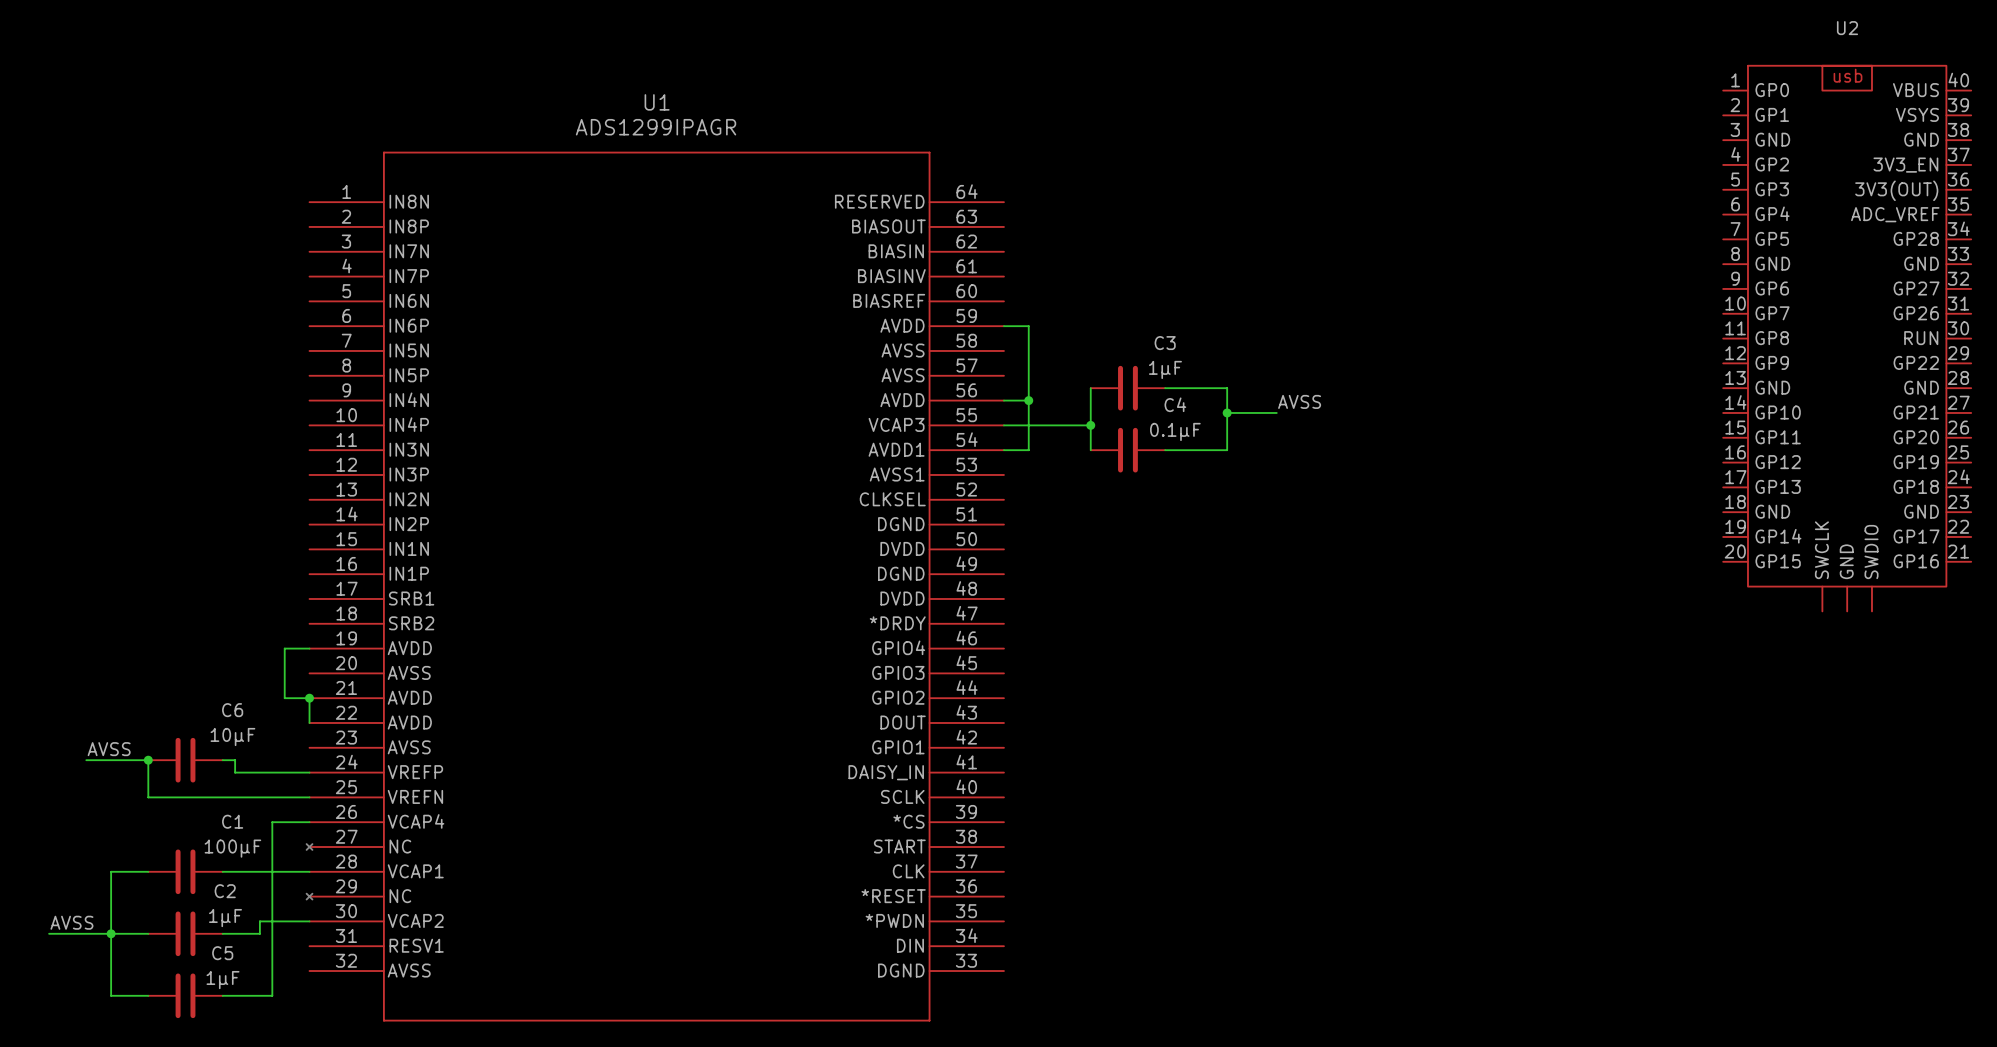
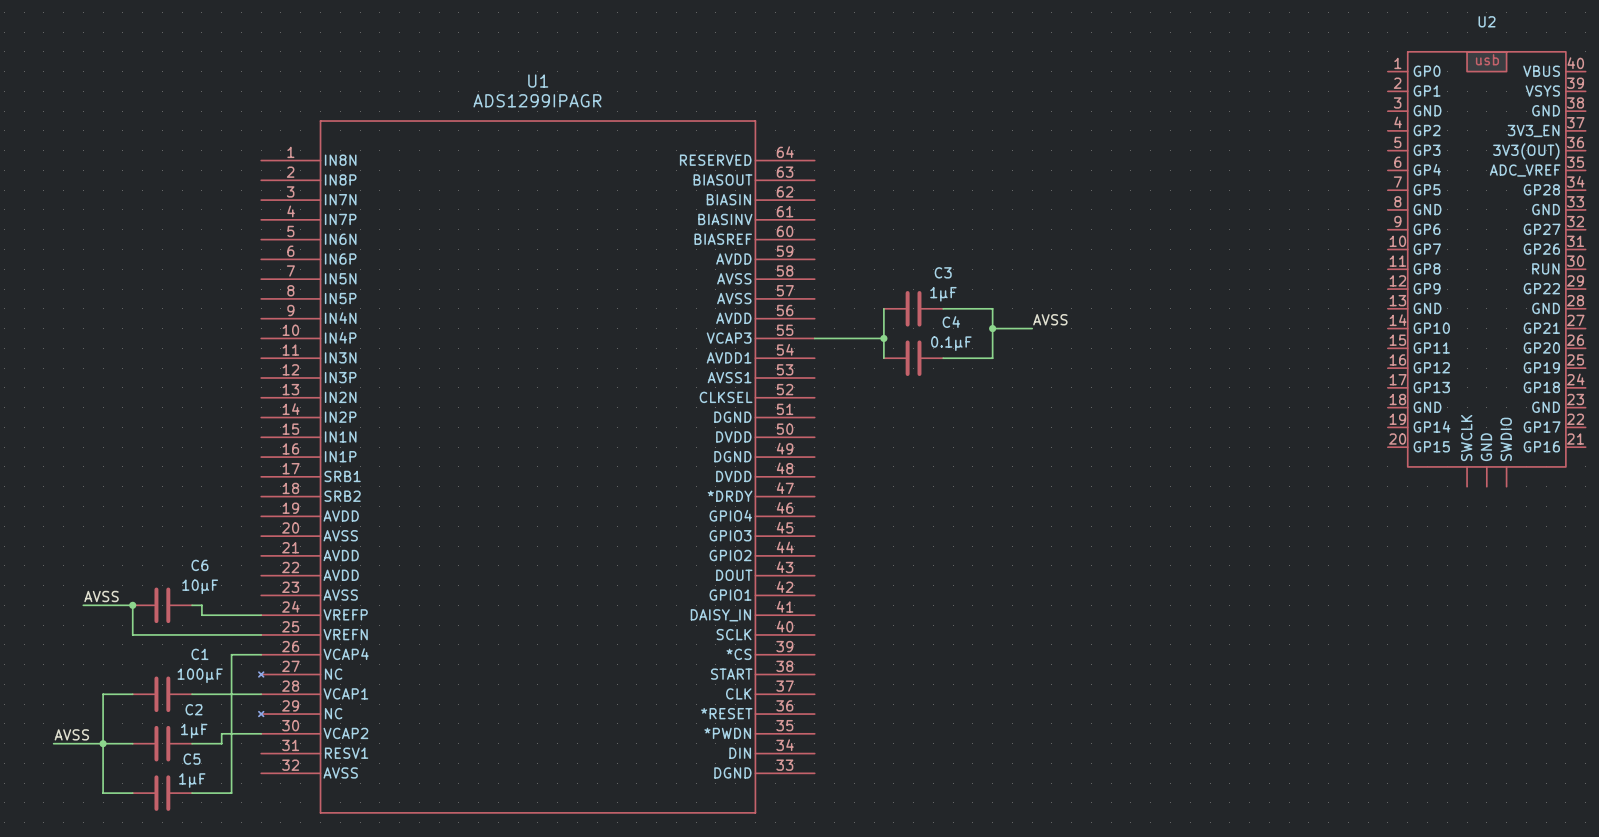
wire: (1003, 326) (1028, 326) (1028, 450) (1003, 450) -> none
wire: (1003, 400) (1028, 400) -> none
junction: (1028, 400) -> none
wire: (309, 648) (284, 648) (284, 698) (309, 698) (309, 722) -> none
junction: (309, 698) -> none

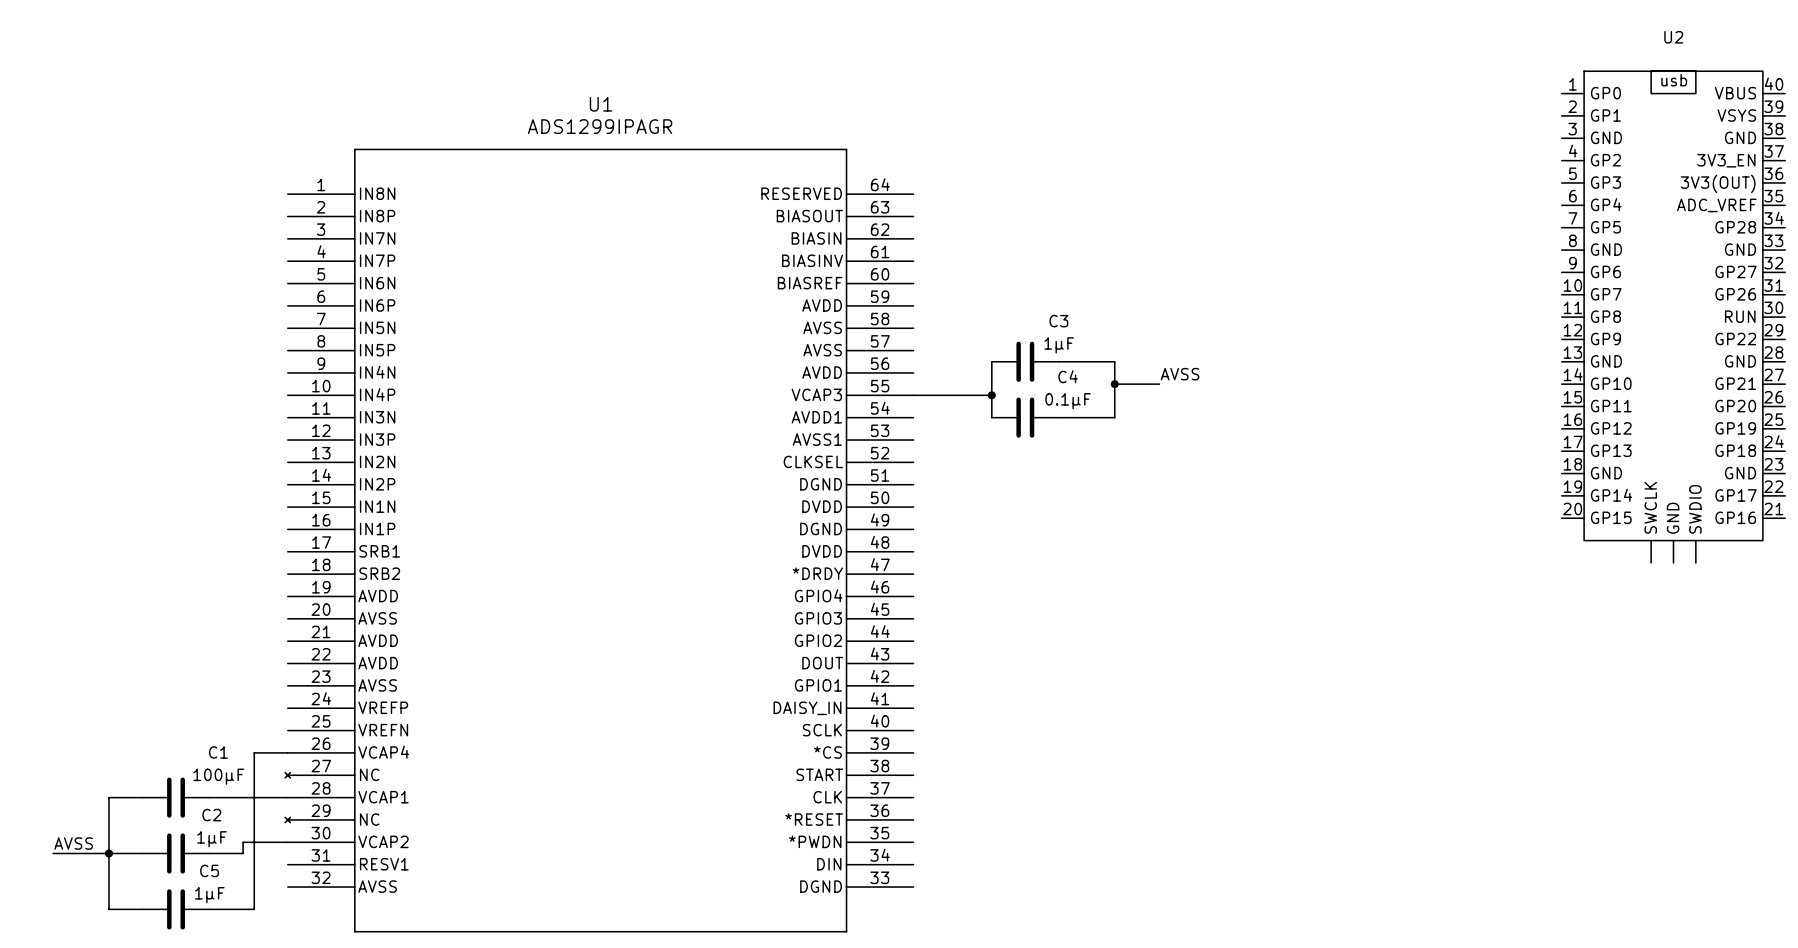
label: AVSS (101, 596) -> none
wire: (83, 605) (132, 605) (132, 634) (261, 634) -> none
junction: (132, 605) -> none
C6: 10µF (162, 605) -> none
wire: (192, 605) (201, 605) (201, 615) (261, 615) -> none

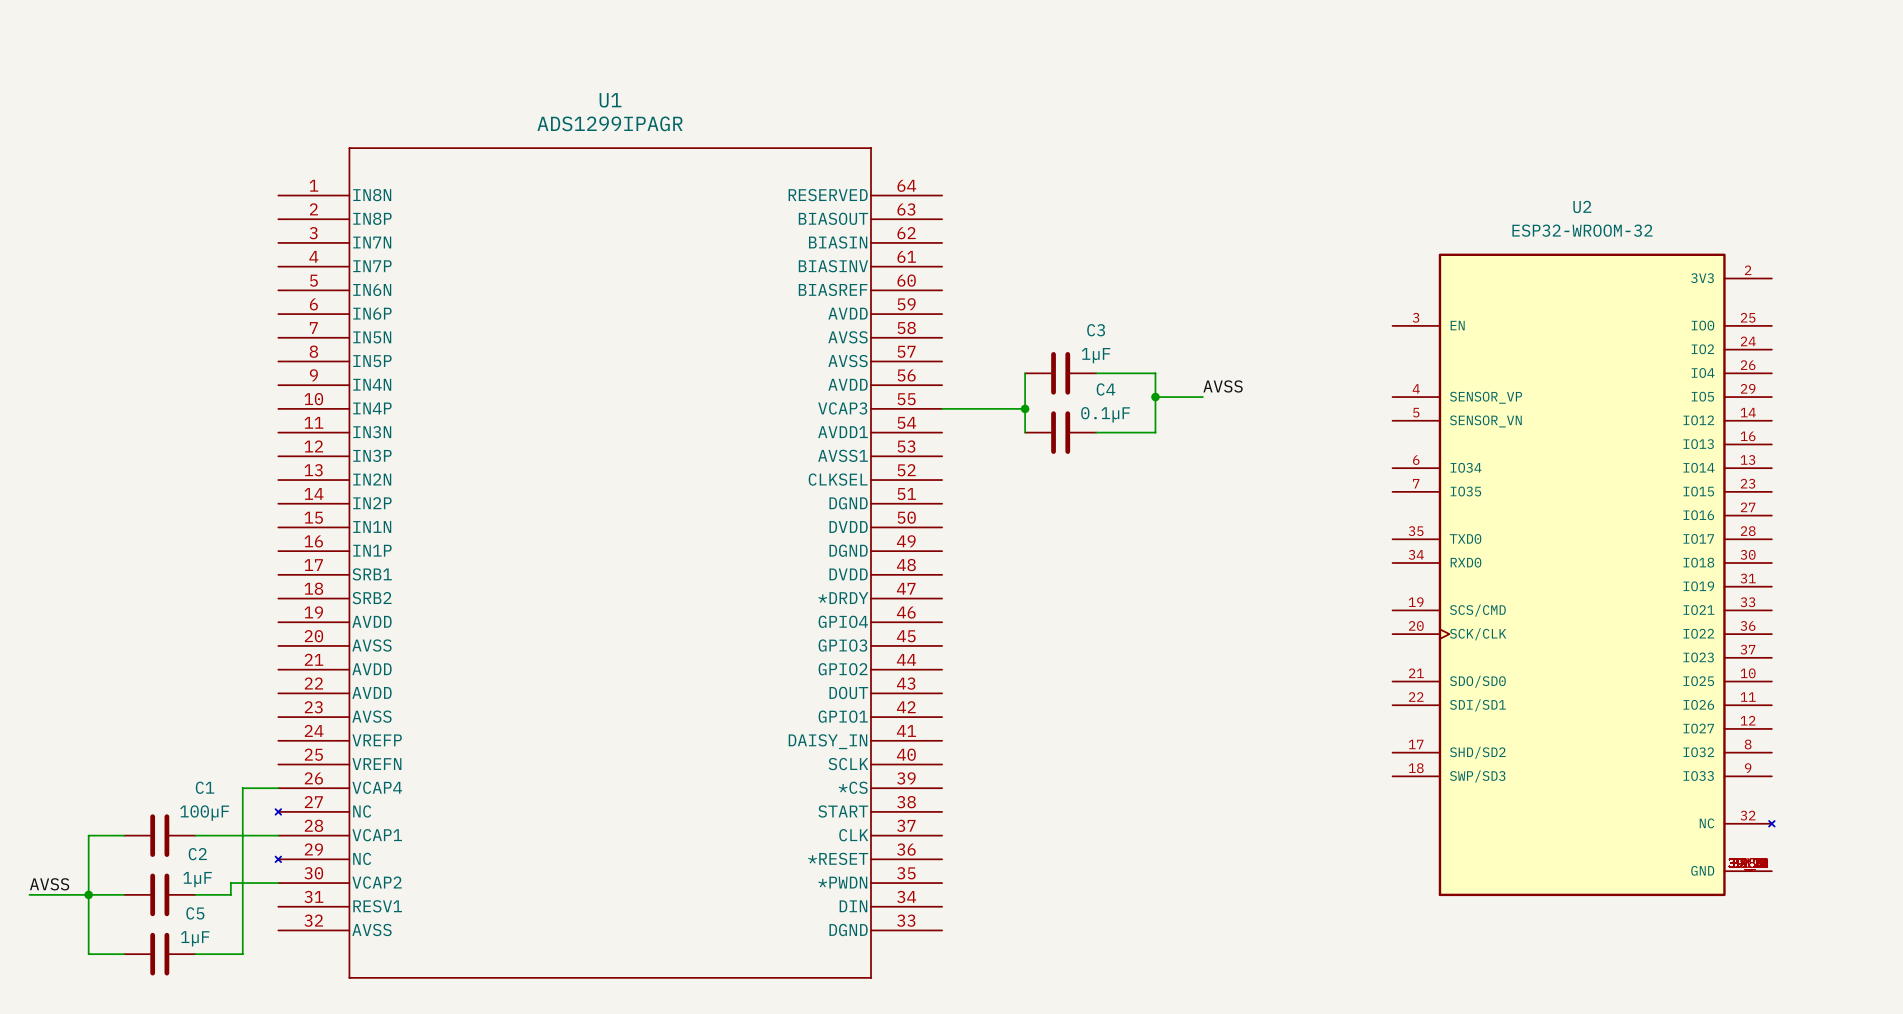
U2 name position: U2 (1673, 37) -> U2 (1582, 206)
U2 symbol: [1561, 71, 1786, 563] -> [1392, 253, 1775, 897]
U2 value: none -> ESP32-WROOM-32 (1582, 230)

